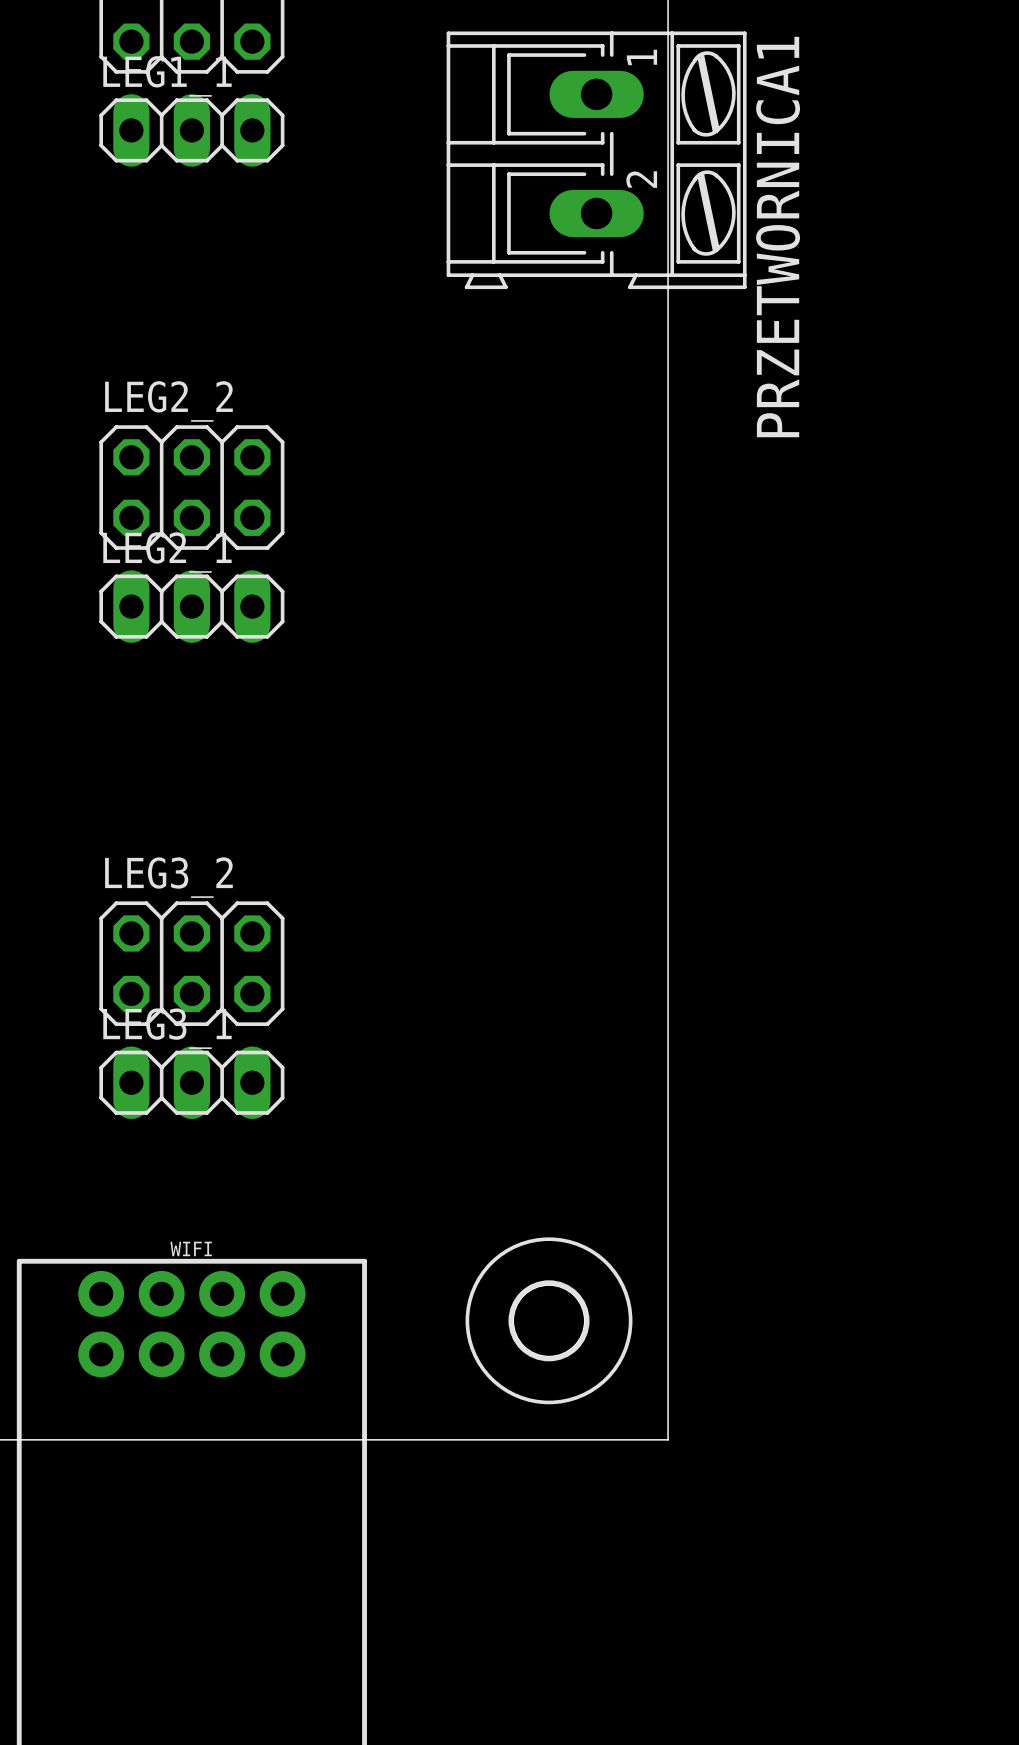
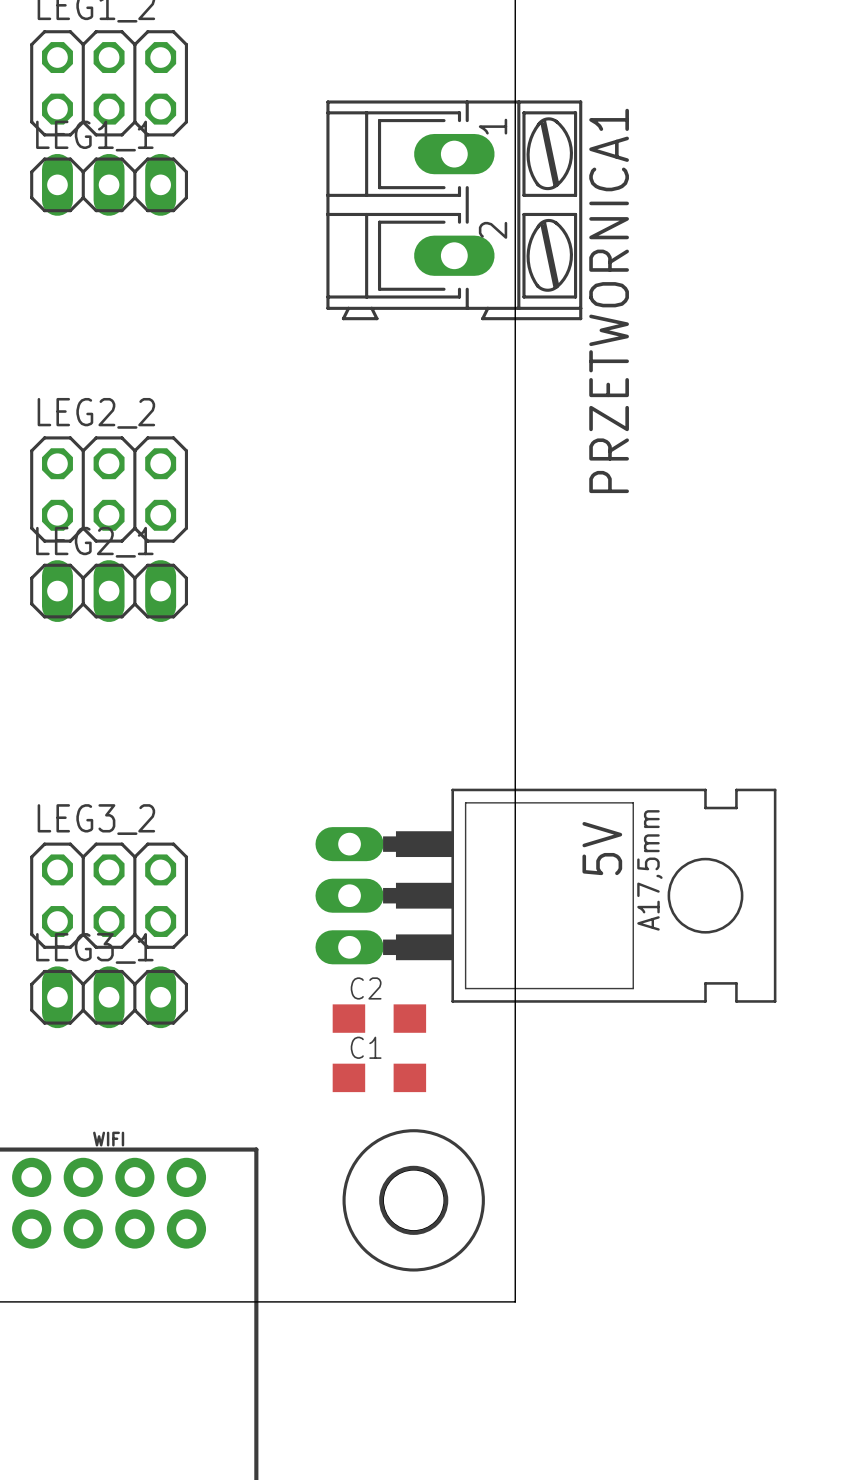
5V: none -> (545, 895)
C2: none -> (379, 1018)
C1: none -> (379, 1077)

